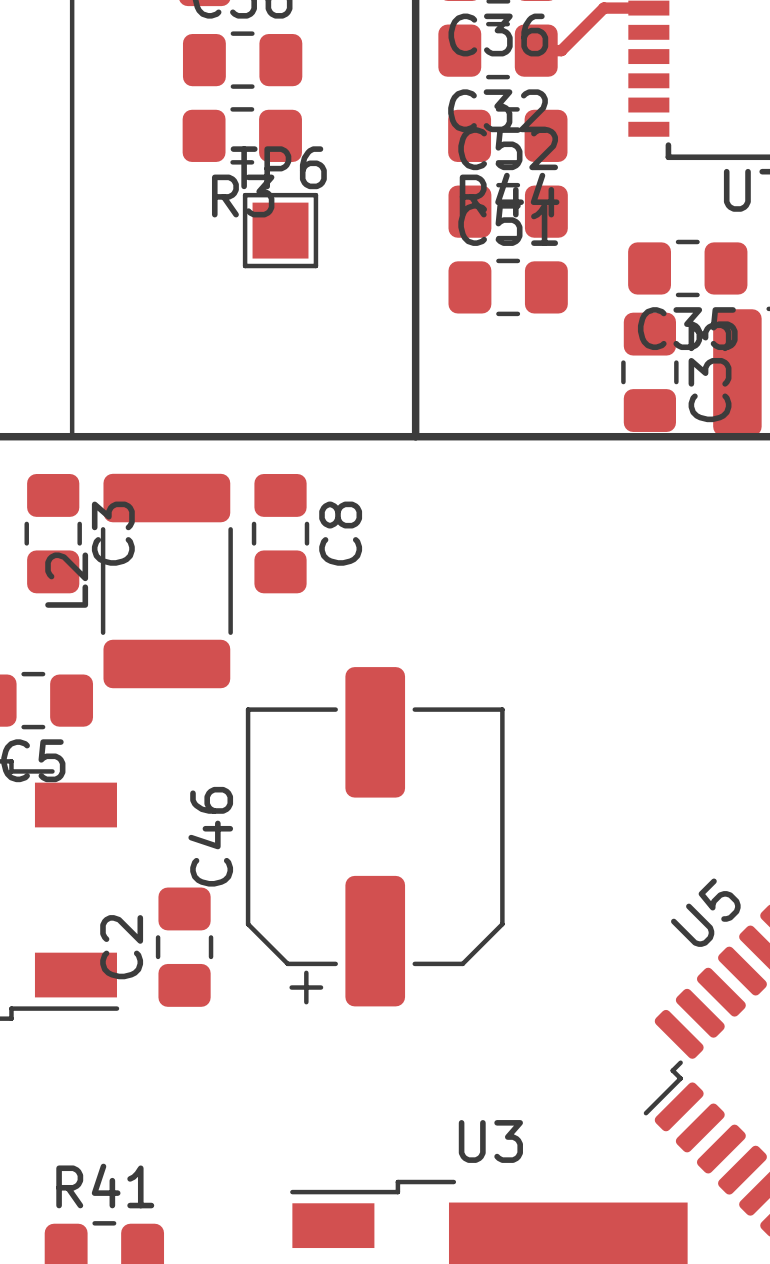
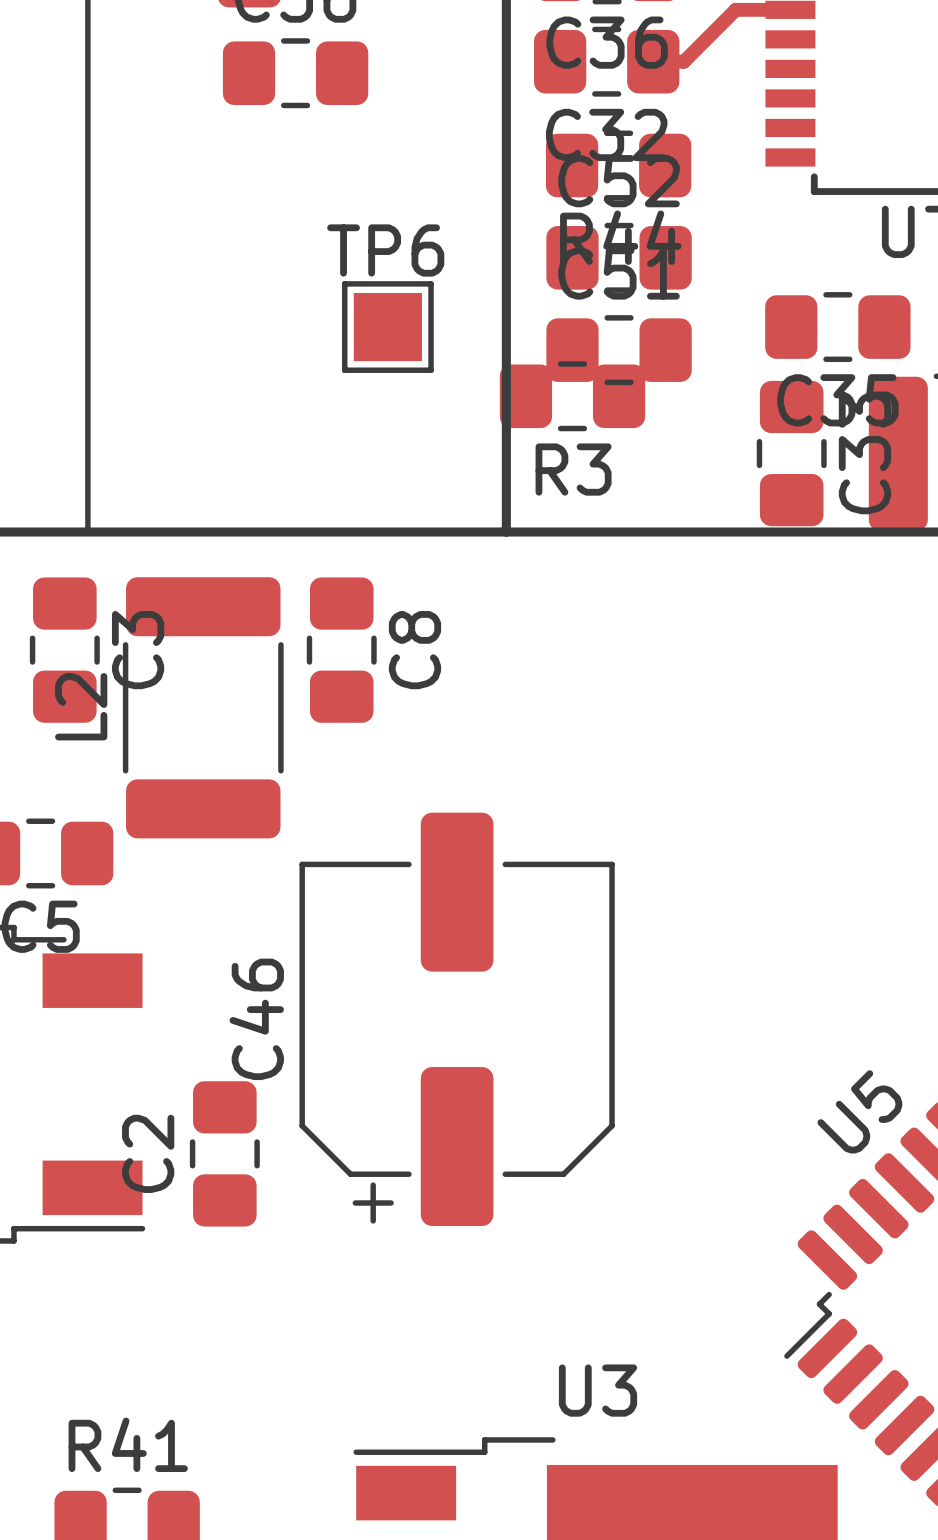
R3 position: (242, 135) -> (572, 396)
TP6 position: (280, 230) -> (387, 327)

